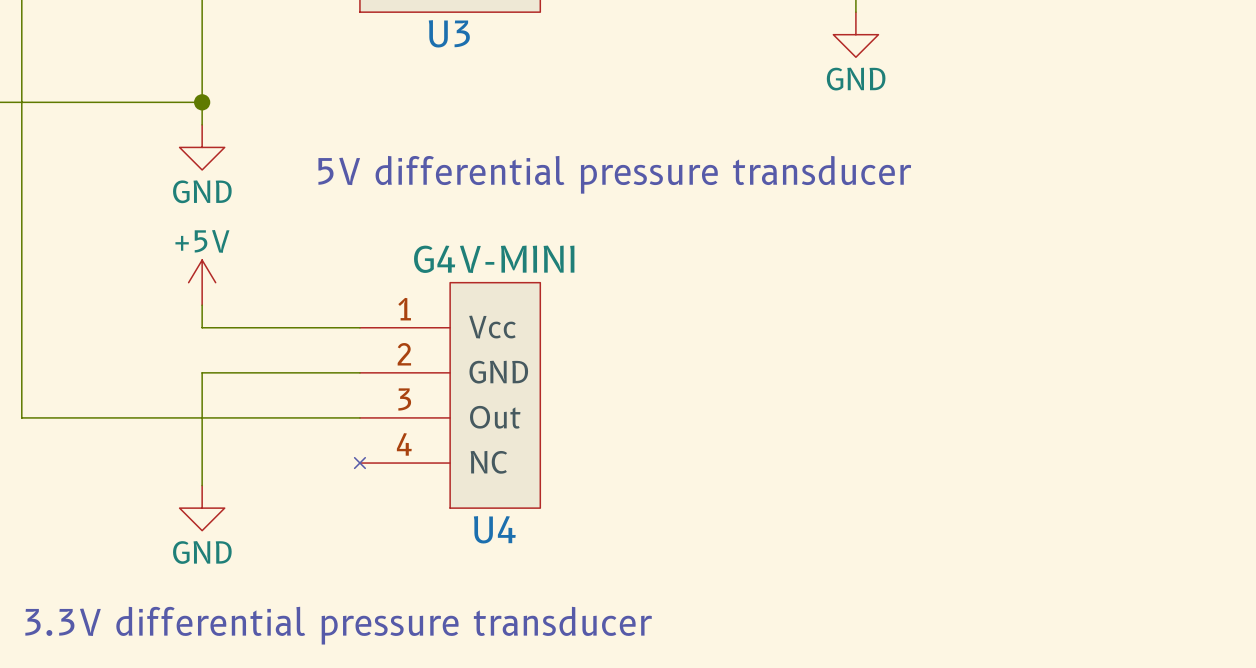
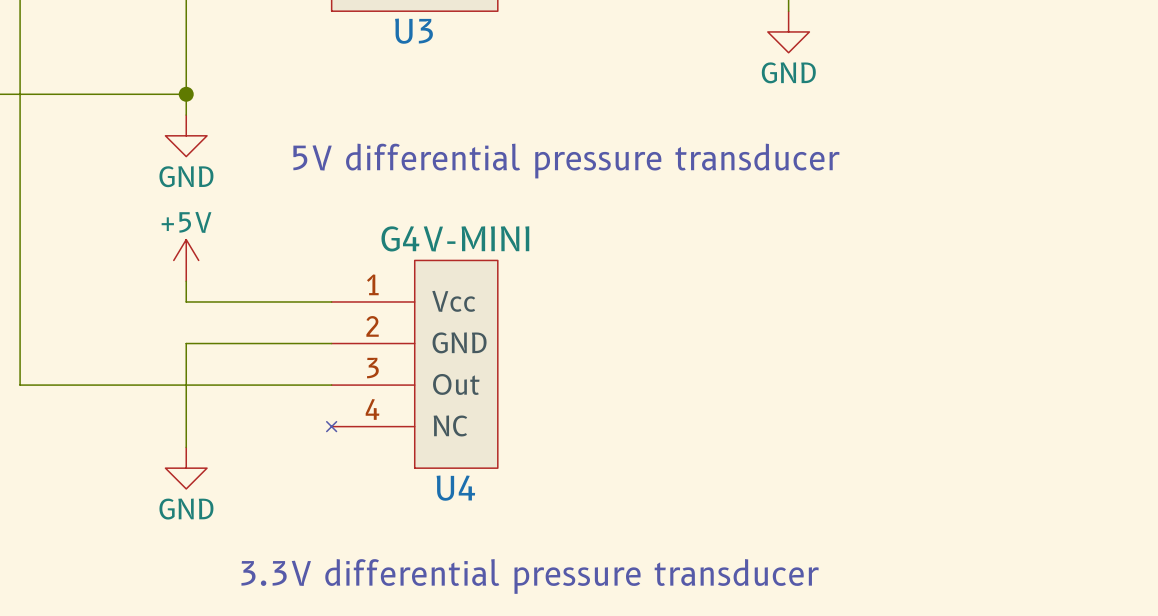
text position: 3.3V differential pressure transducer (338, 625) -> 3.3V differential pressure transducer (530, 576)

